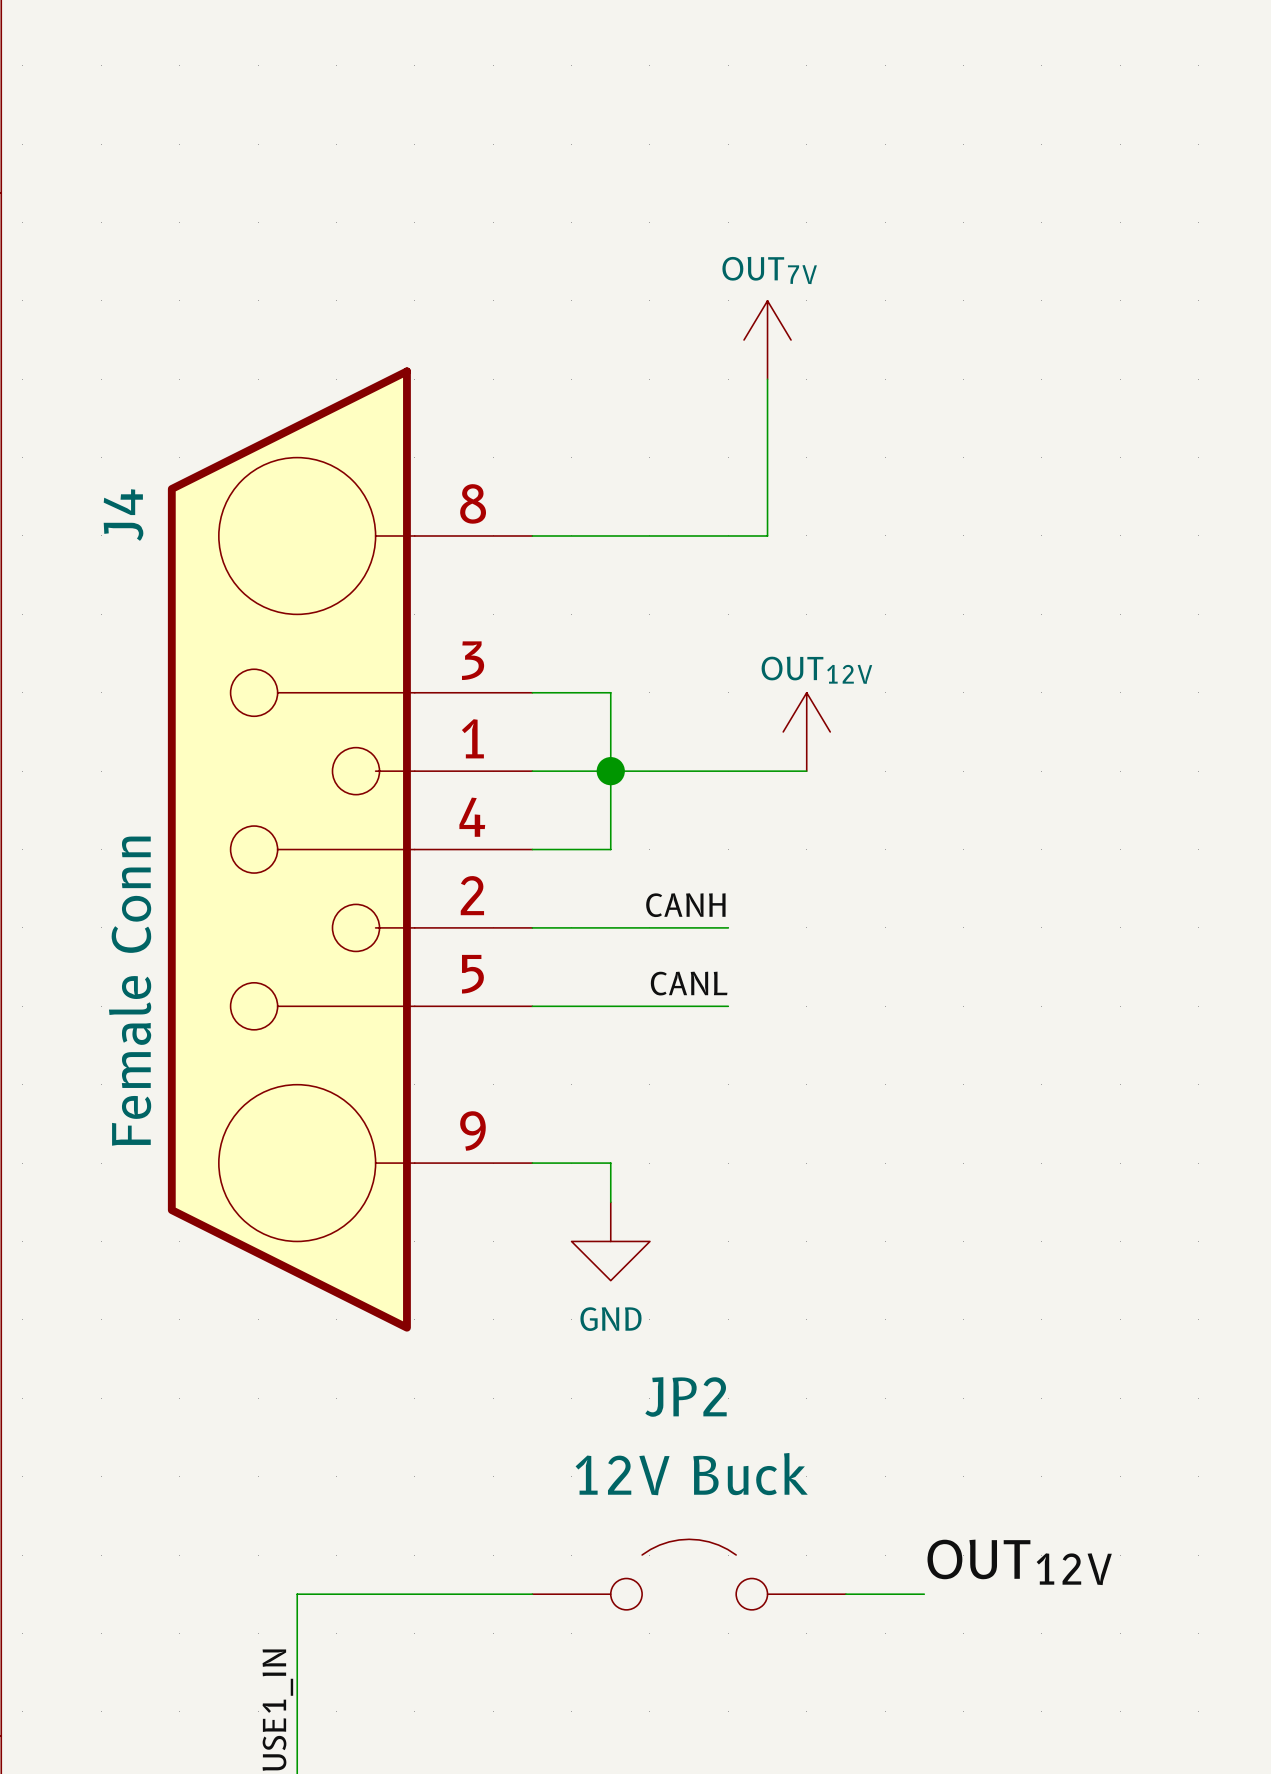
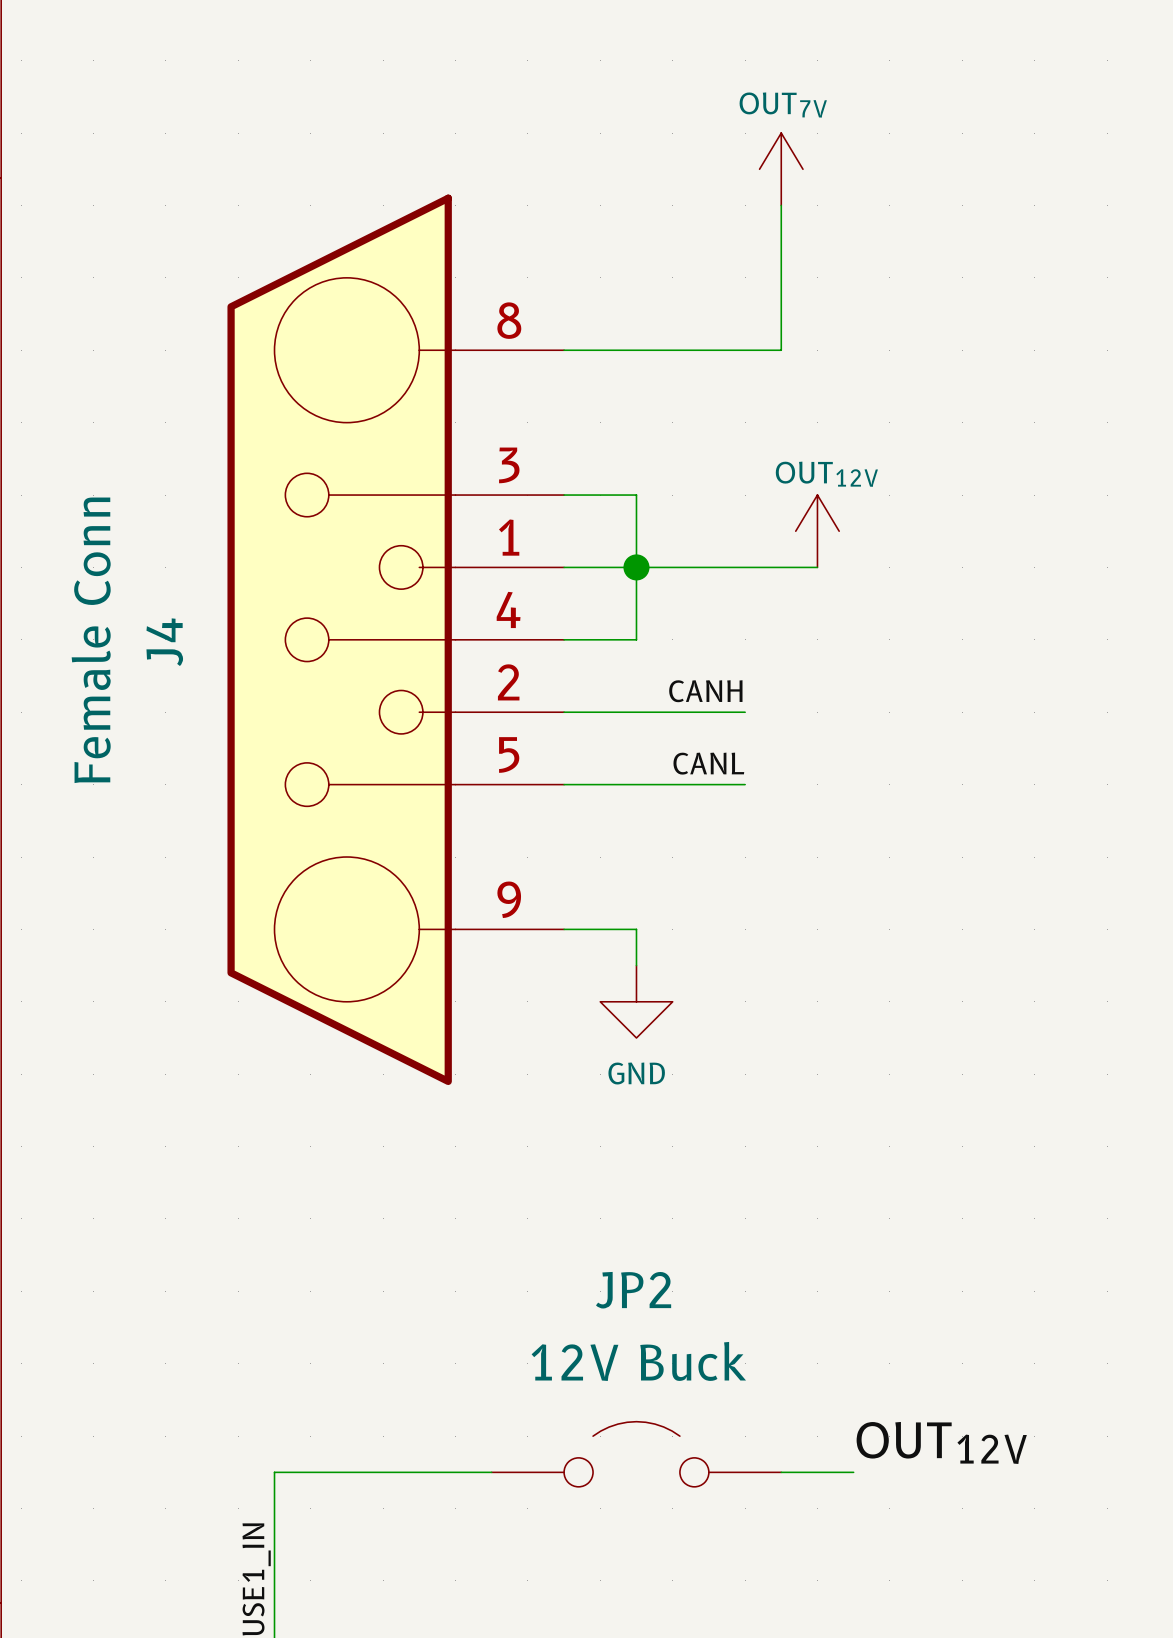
wire: none -> (781, 205) (781, 350) (564, 350)
power symbol position: OUT7V (767, 340) -> OUT7V (781, 169)
wire: (767, 379) (767, 535) (689, 535) -> (564, 639) (636, 639) (636, 495)
J4 name position: J4 (123, 515) -> J4 (164, 642)
wire: none -> (564, 567) (817, 567)
wire: (532, 692) (610, 692) (610, 849) (532, 849) -> none
power symbol position: OUT12V (806, 731) -> OUT12V (817, 531)
junction position: (610, 771) -> (636, 567)
J4 position: (350, 849) -> (395, 639)
label position: CANH (685, 905) -> CANH (705, 691)
wire: (532, 927) (728, 927) -> (564, 784) (745, 784)
label position: CANL (689, 983) -> CANL (708, 763)
J4 value position: Female Conn (130, 991) -> Female Conn (91, 640)
wire: (689, 1006) (728, 1006) -> (636, 929) (636, 965)
wire: (532, 1163) (610, 1163) (610, 1202) -> none
power symbol position: GND (610, 1241) -> GND (636, 1001)

